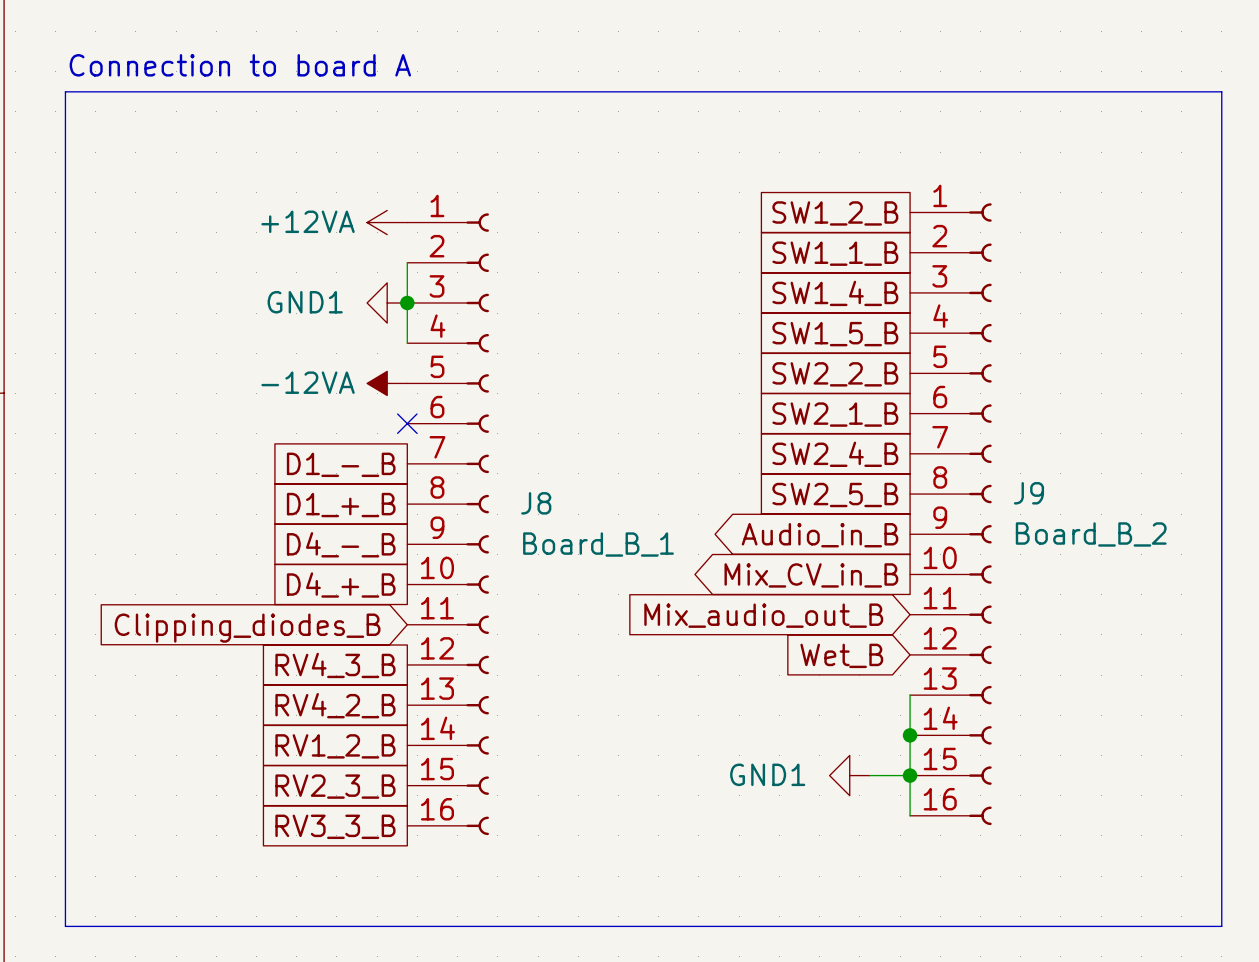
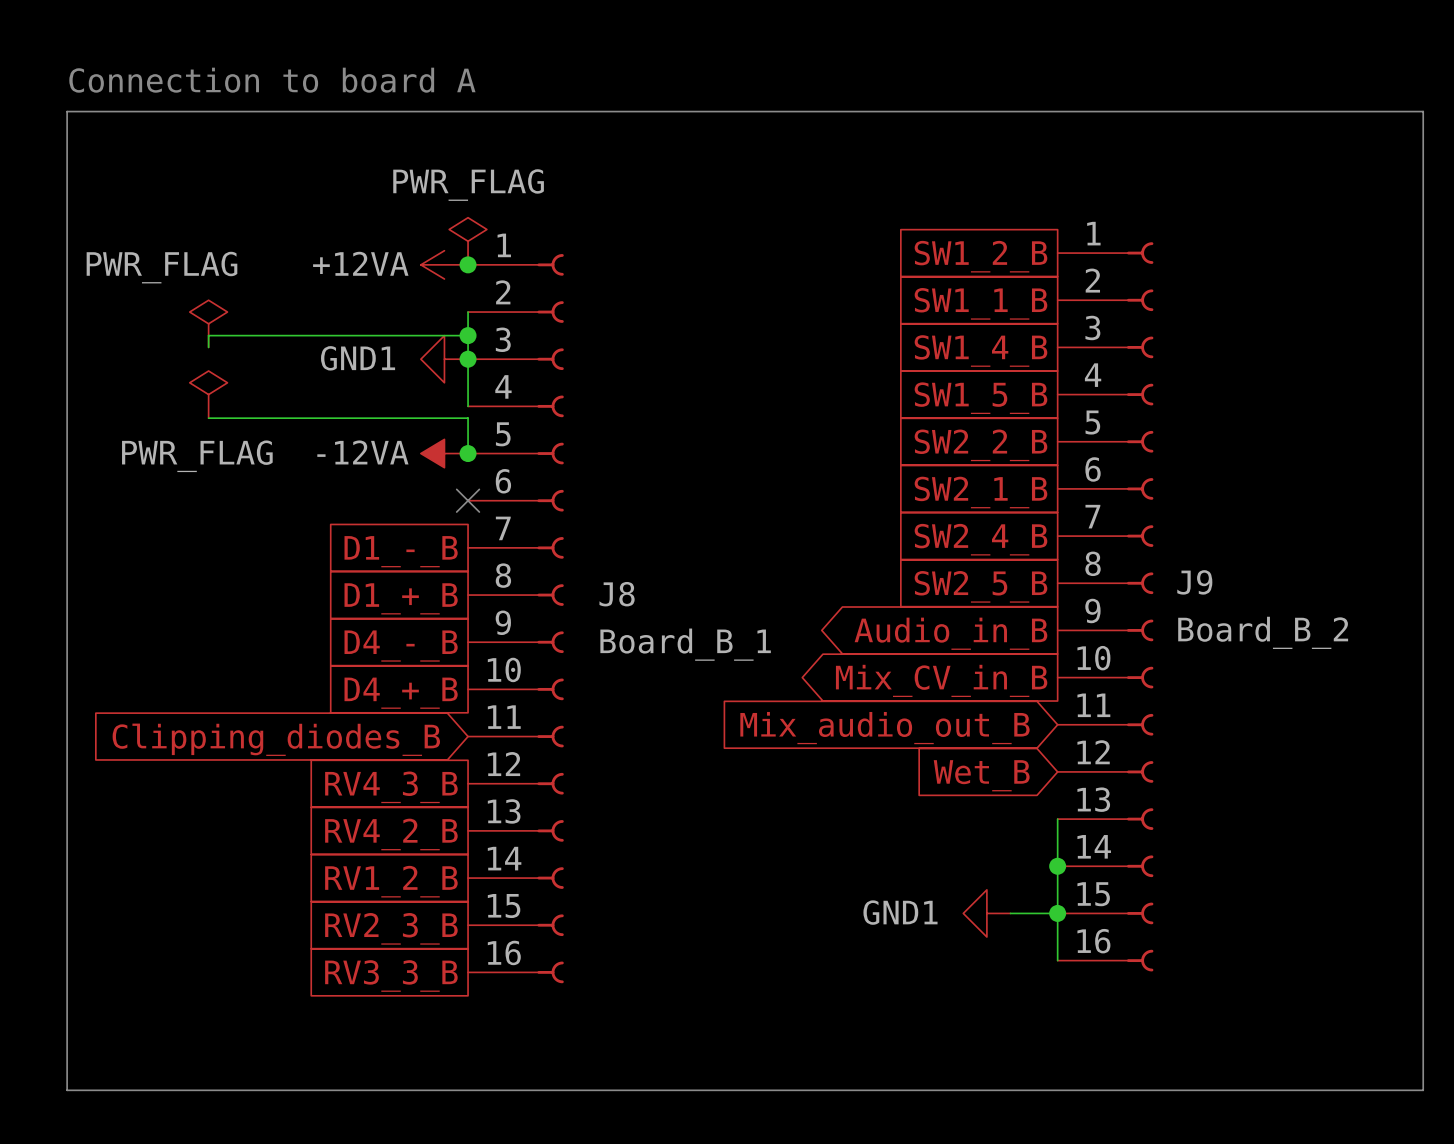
power symbol: none -> PWR_FLAG (468, 241)
junction: none -> (468, 264)
power symbol: none -> PWR_FLAG (208, 323)
wire: none -> (468, 335) (208, 335) (208, 347)
junction: none -> (468, 335)
power symbol: none -> PWR_FLAG (208, 394)
wire: none -> (208, 418) (468, 418) (468, 453)
junction: none -> (468, 453)

